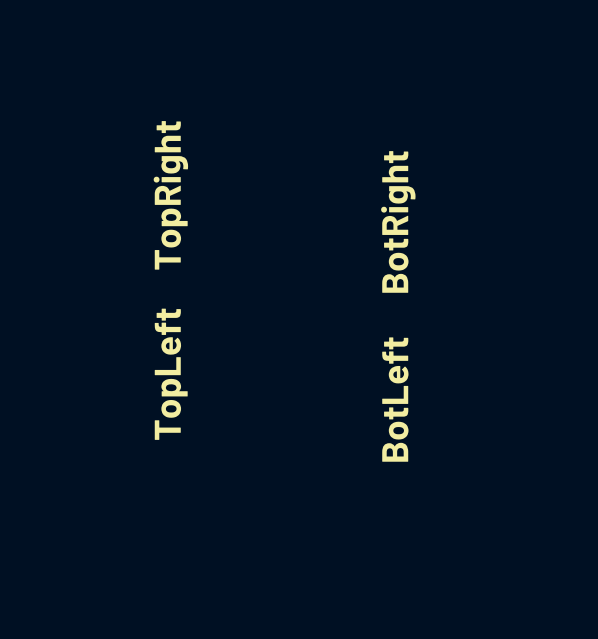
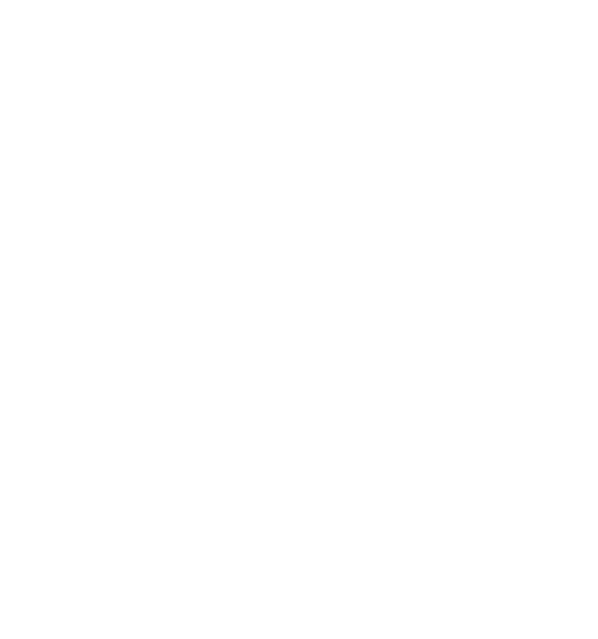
text: TopRight (170, 195) -> none
text: BotRight (398, 221) -> none
text: TopLeft (171, 374) -> none
text: BotLeft (395, 399) -> none

